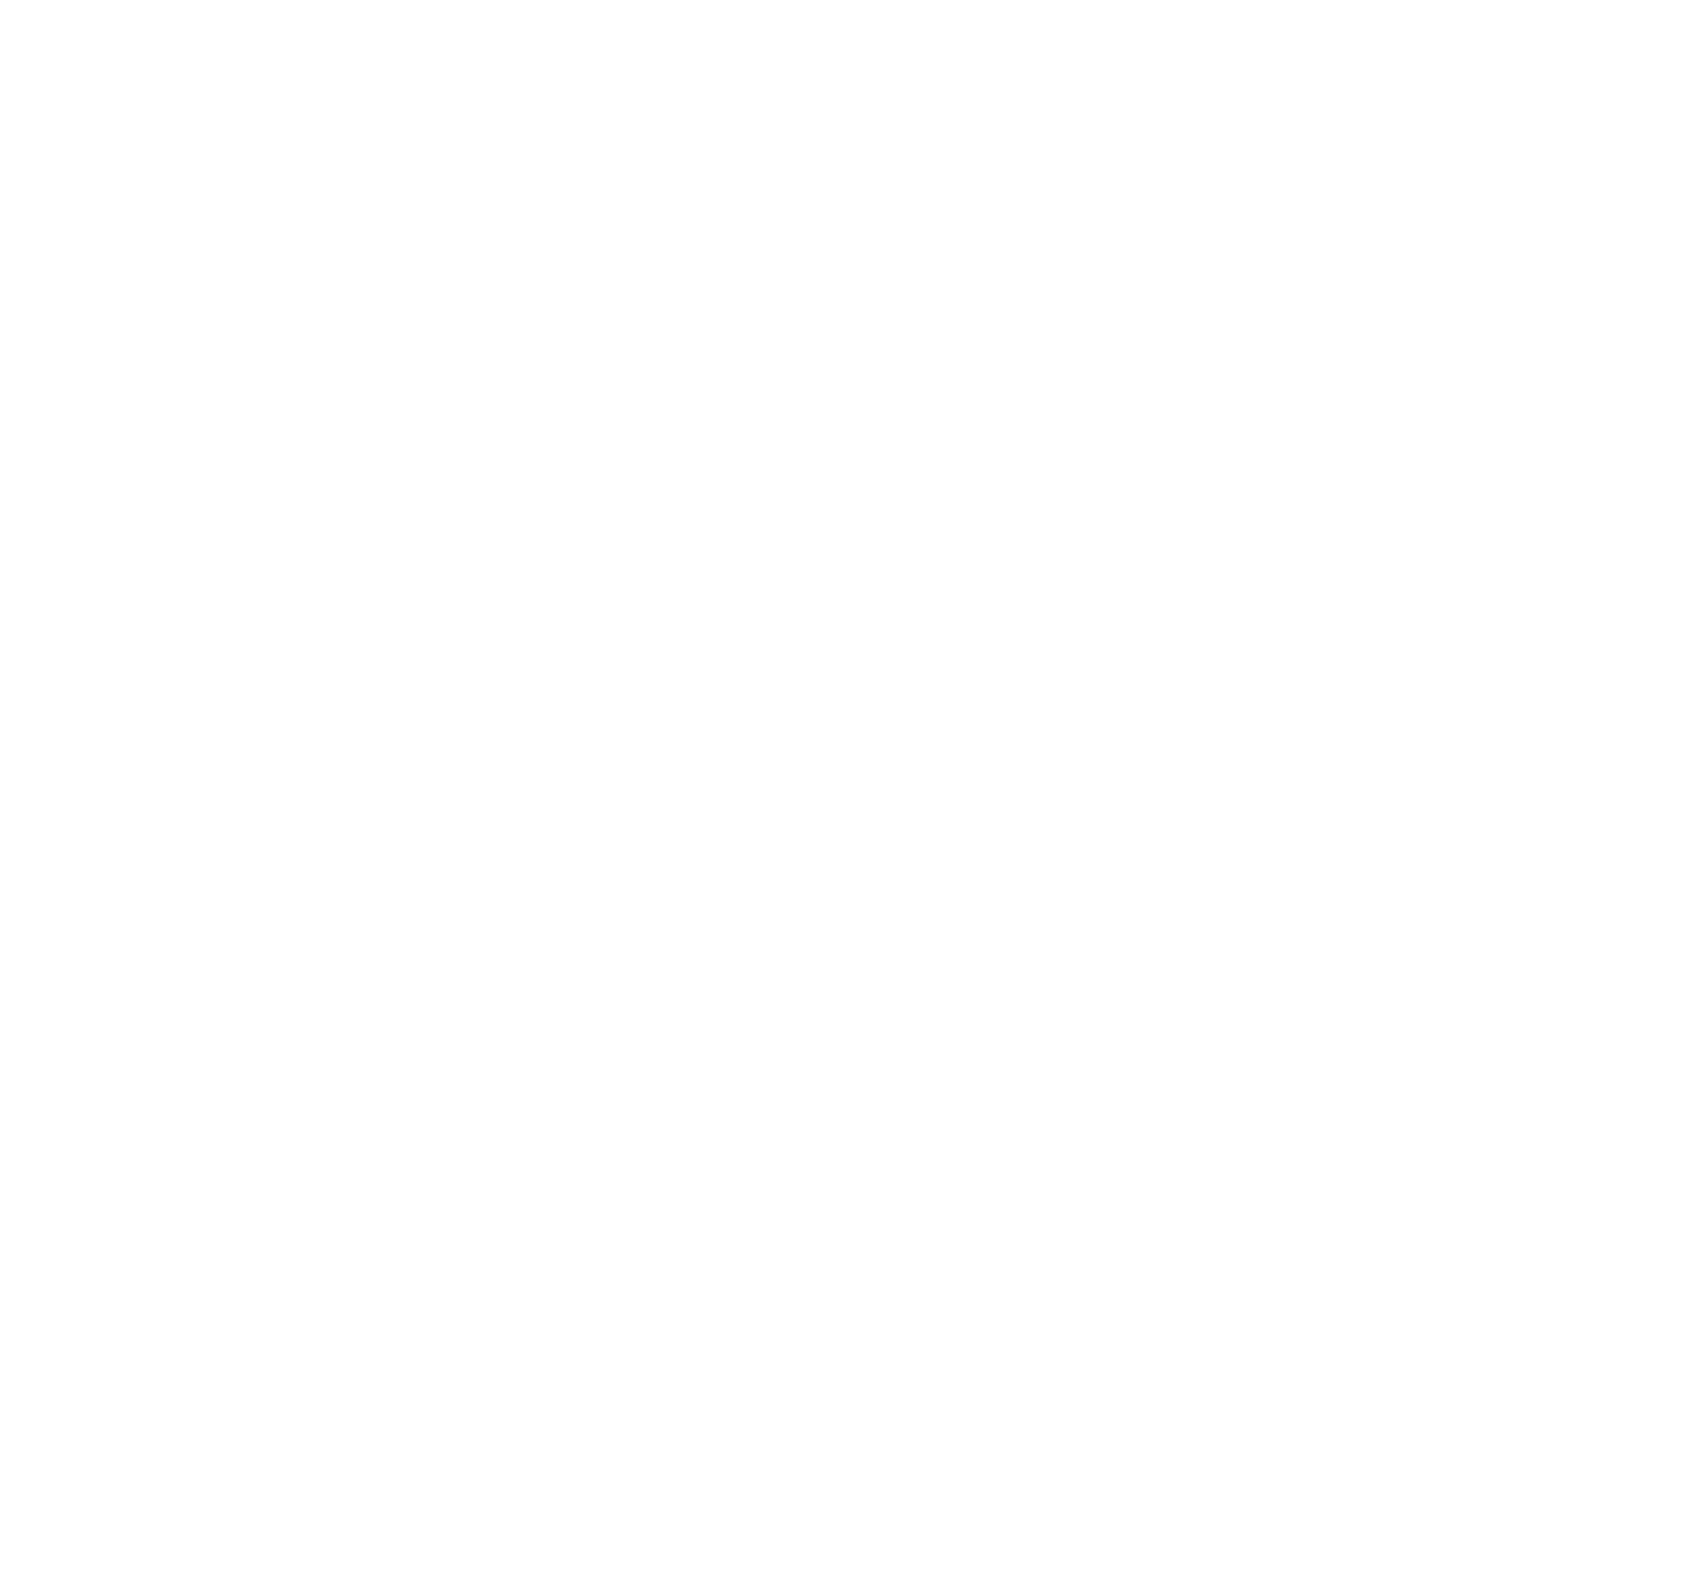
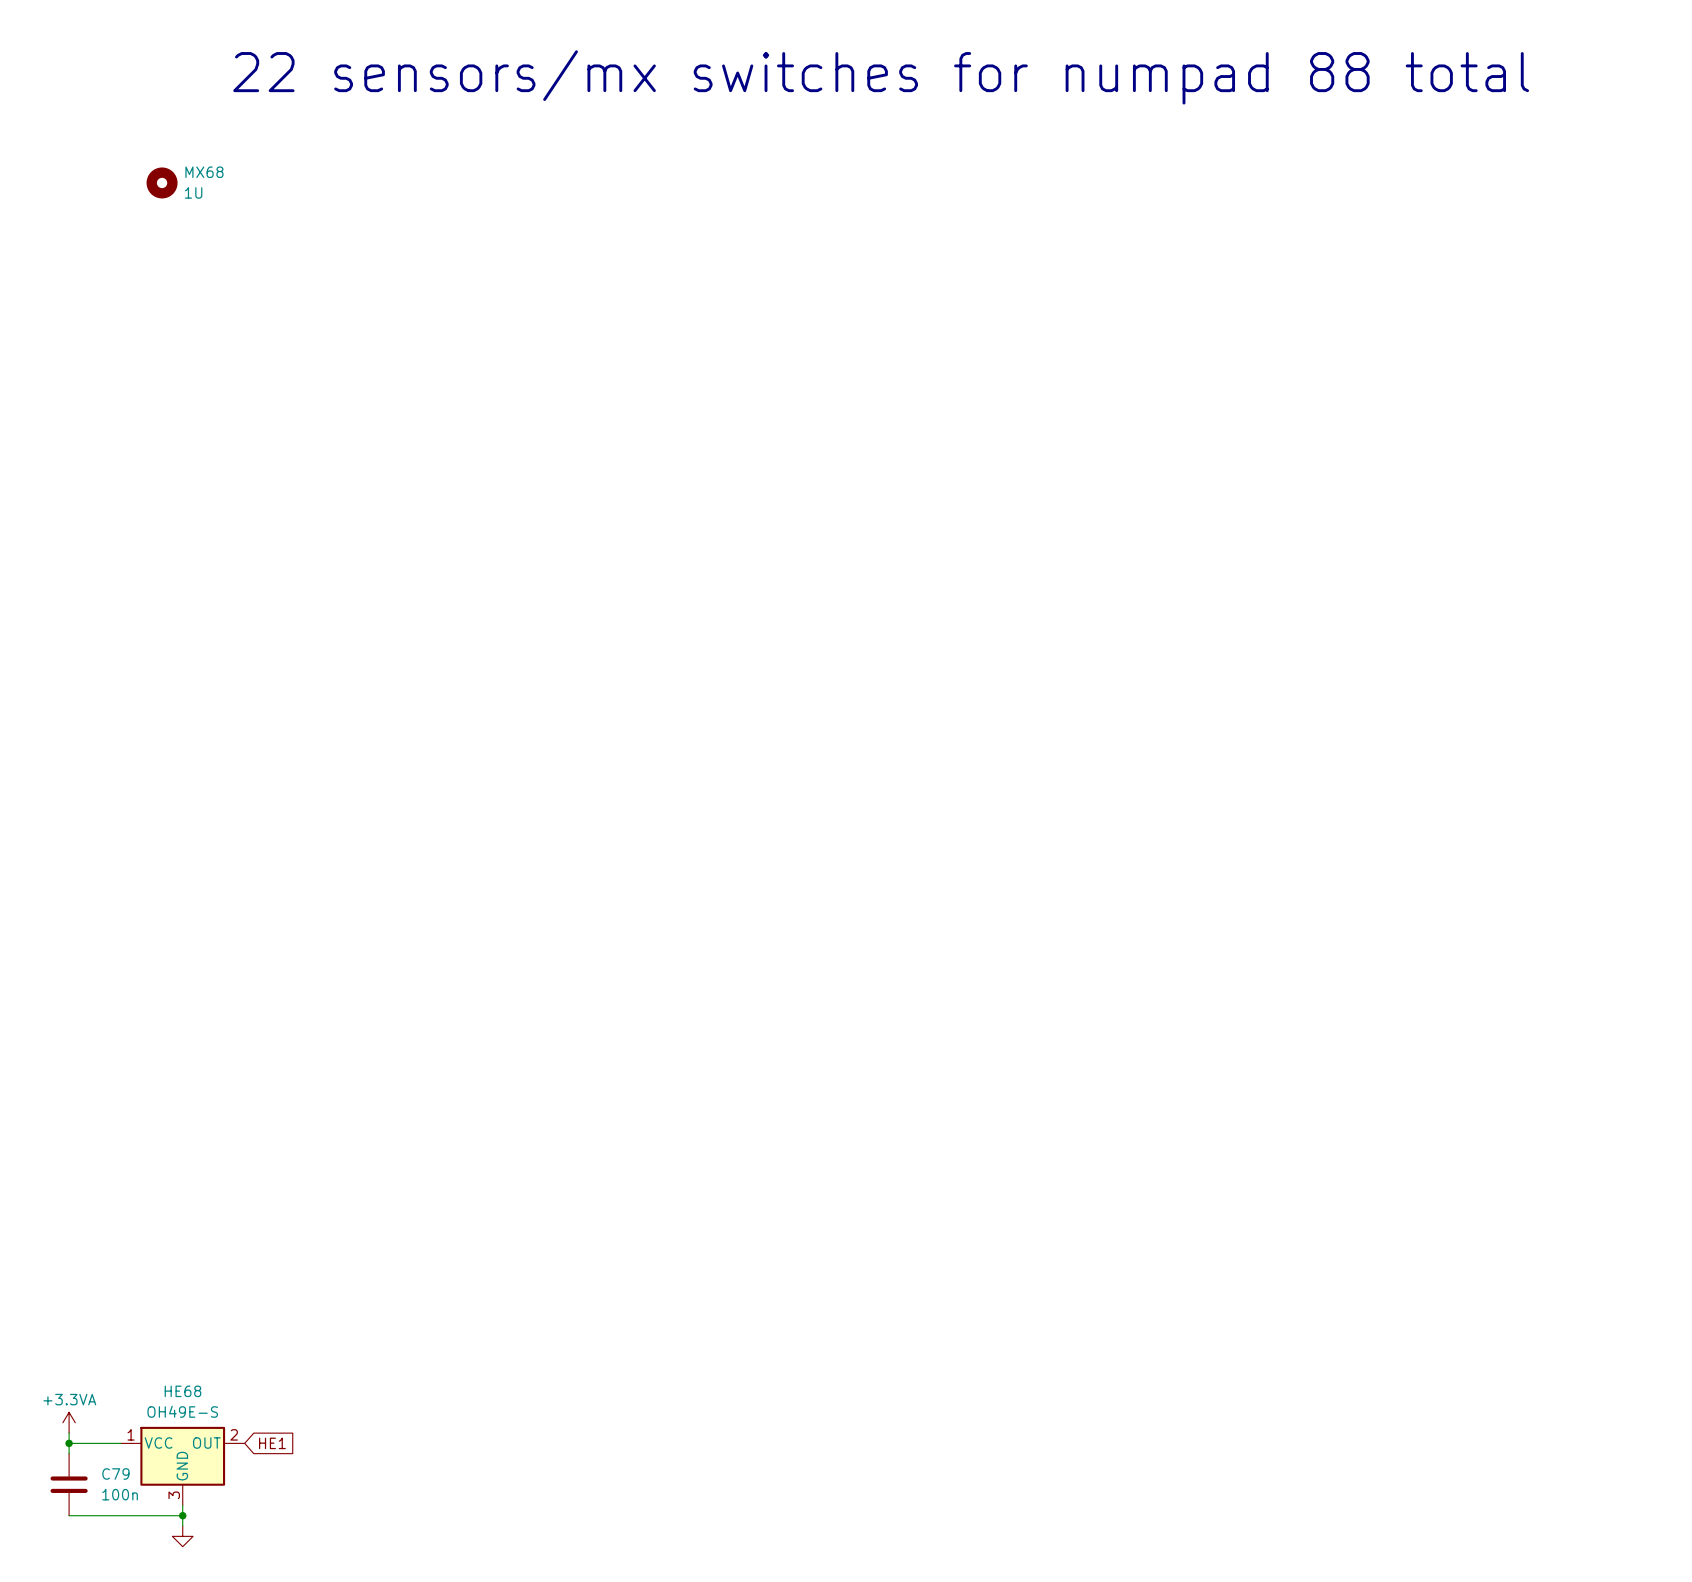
text: none -> 22 sensors/mx switches for numpad 88 total (881, 77)
MX68: none -> 1U (162, 182)
power symbol: none -> +3.3VA (69, 1422)
wire: none -> (69, 1433) (69, 1453)
wire: none -> (69, 1443) (120, 1443)
junction: none -> (69, 1443)
global label: none -> HE1 (272, 1443)
HE68: none -> OH49E-S (182, 1466)
C79: none -> 100n (69, 1484)
wire: none -> (182, 1505) (182, 1526)
wire: none -> (69, 1515) (182, 1515)
junction: none -> (182, 1515)
power symbol: none -> (182, 1536)

